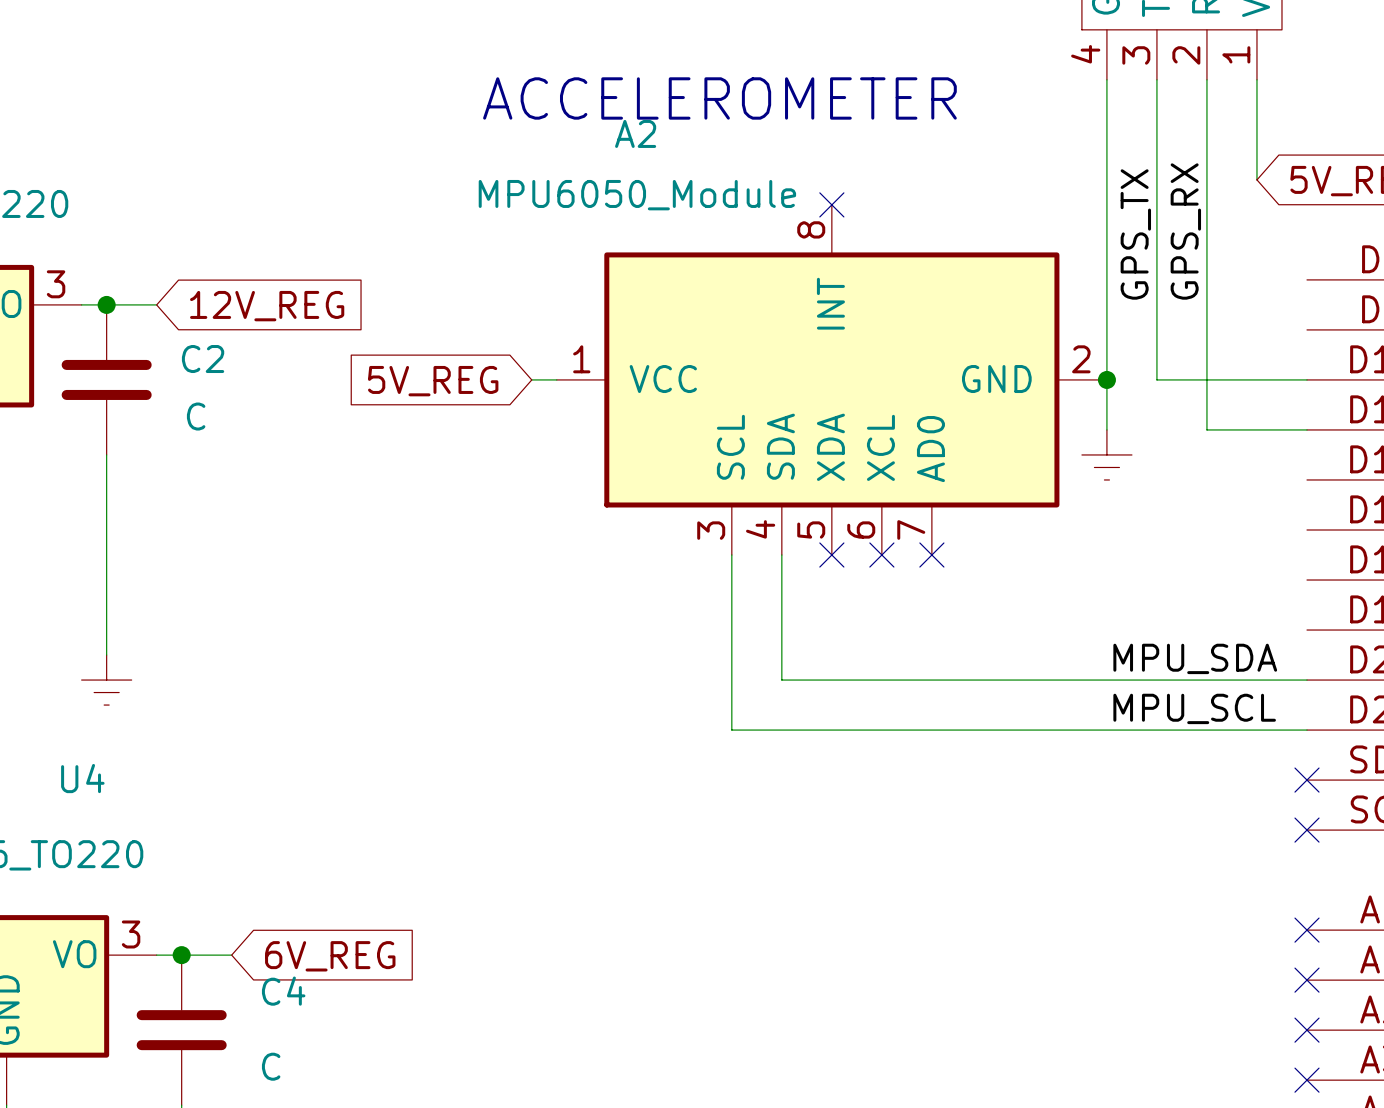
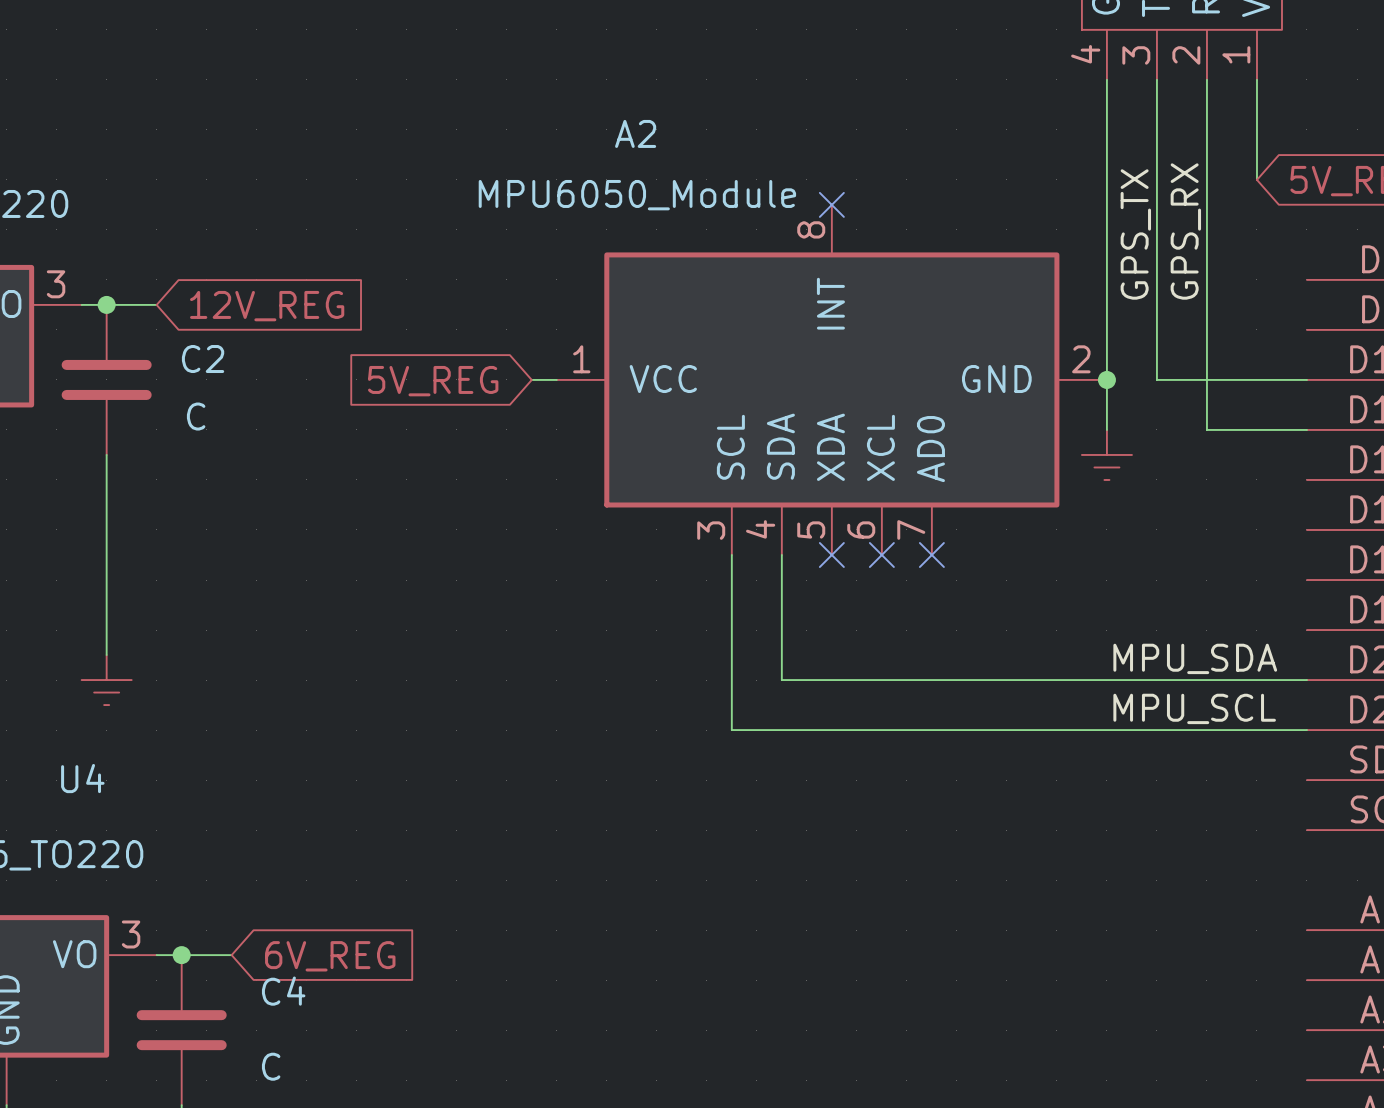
text: ACCELEROMETER (719, 98) -> none
no-connect mark: (1306, 780) -> none
no-connect mark: (1306, 830) -> none
no-connect mark: (1306, 930) -> none
no-connect mark: (1306, 980) -> none
no-connect mark: (1306, 1030) -> none
no-connect mark: (1306, 1080) -> none

